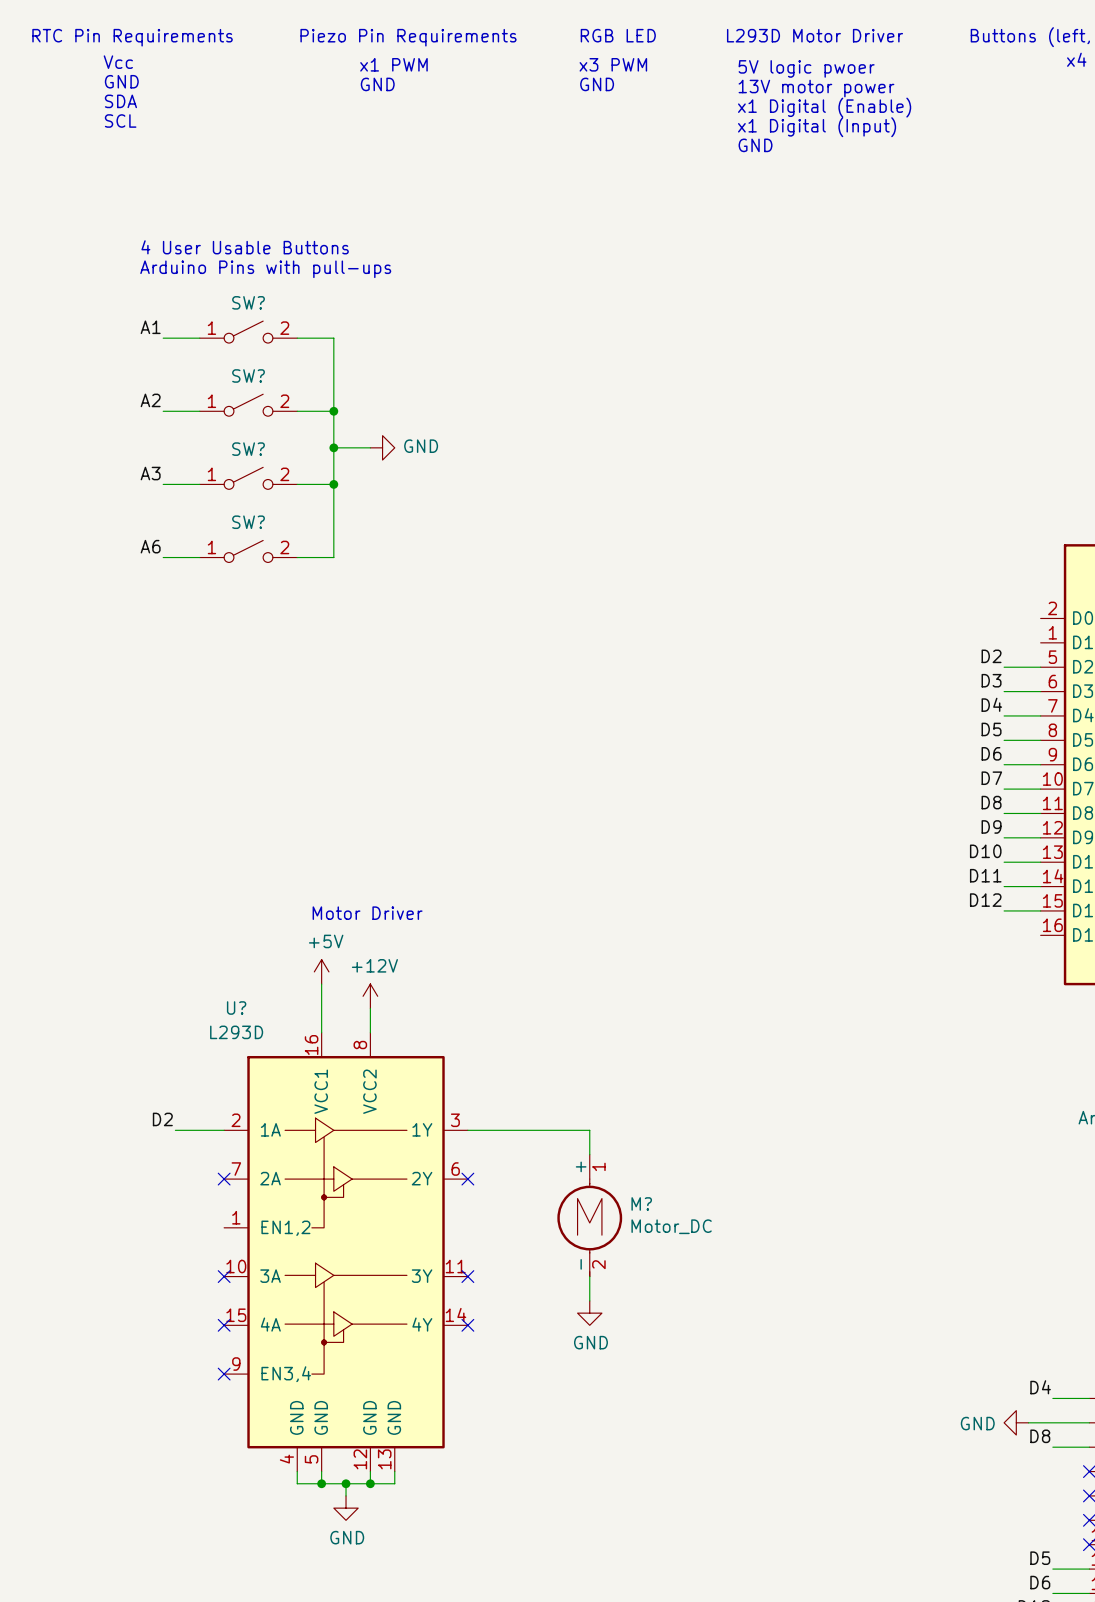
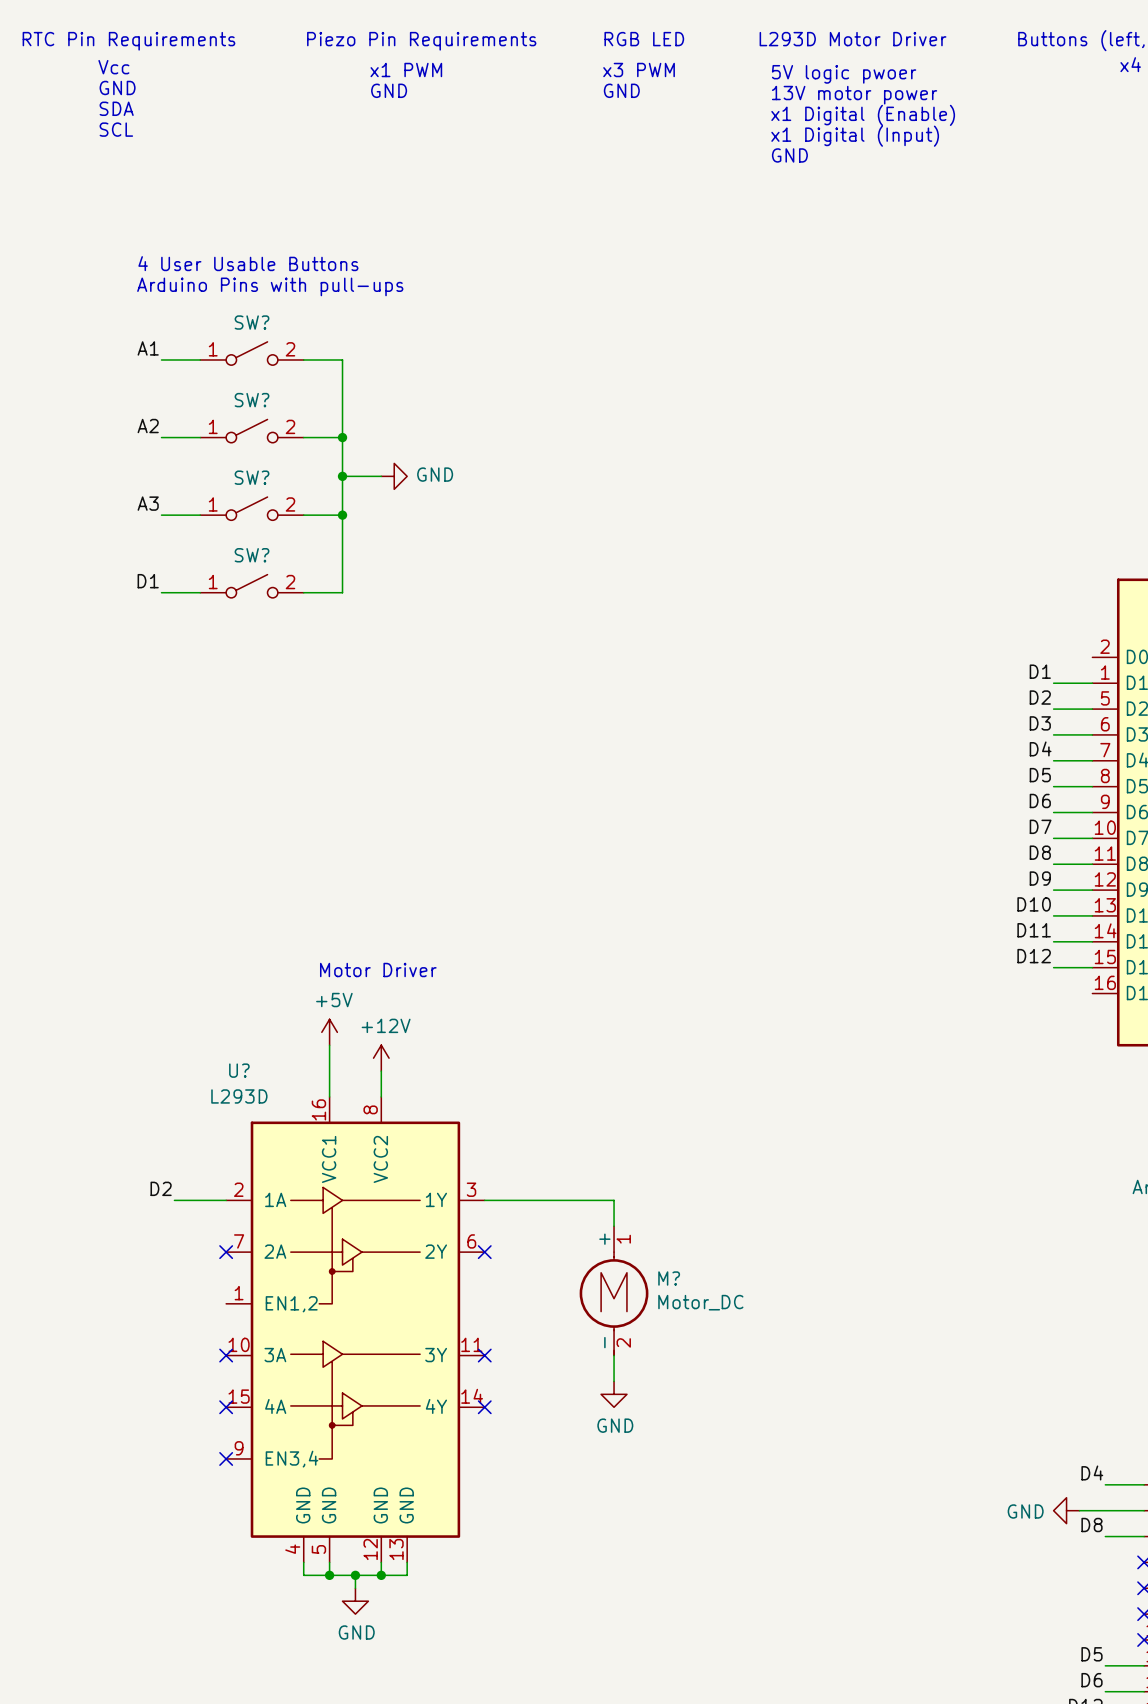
label: A6 (150, 546) -> D1 (148, 581)
label: none -> D1 (1040, 671)
wire: none -> (1053, 683) (1092, 683)

